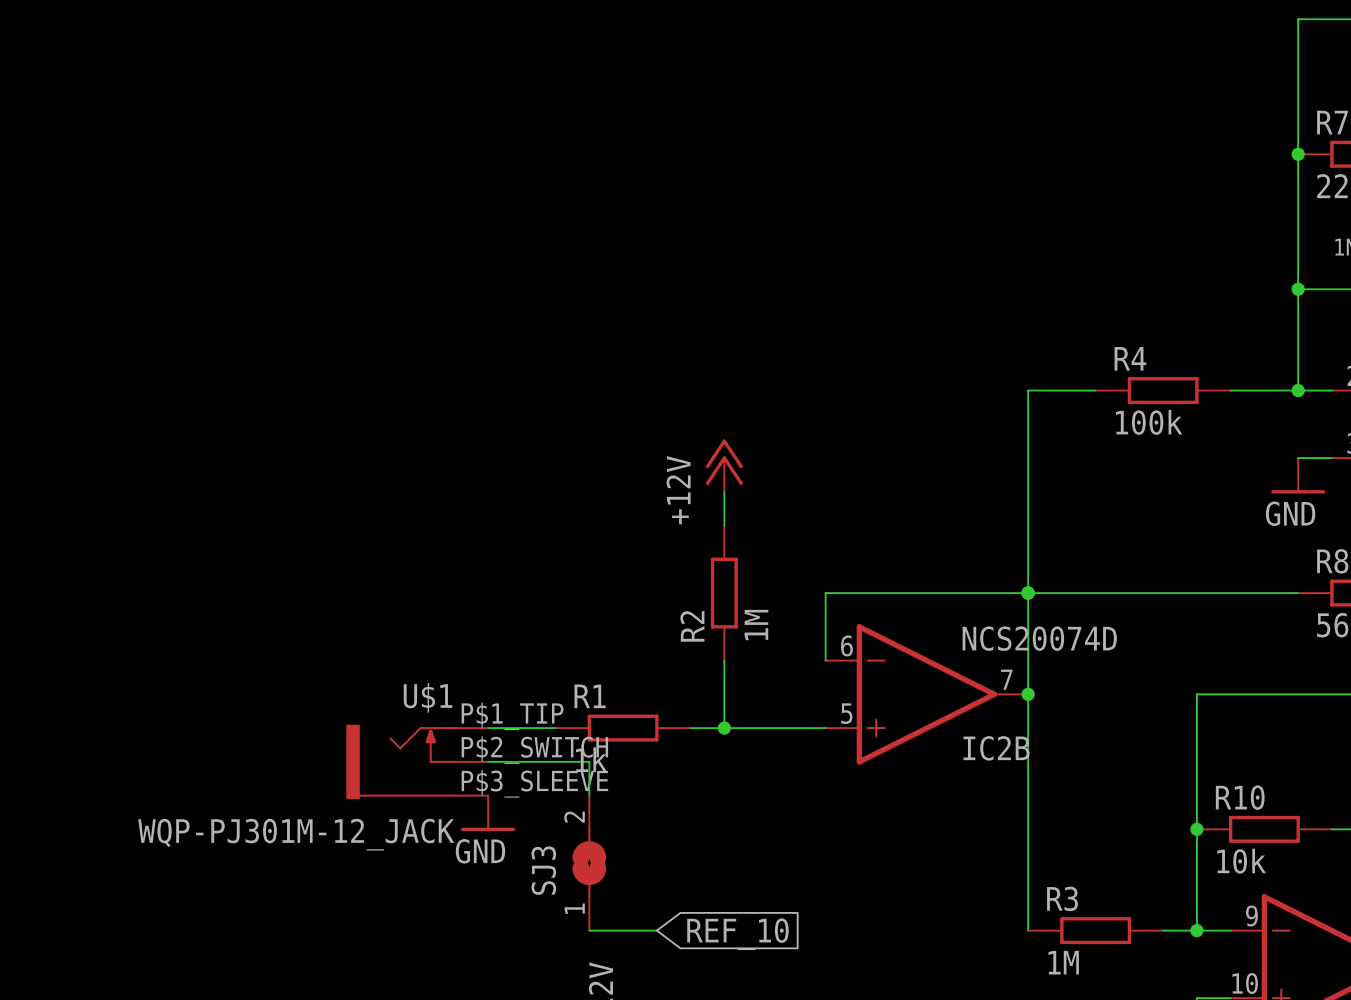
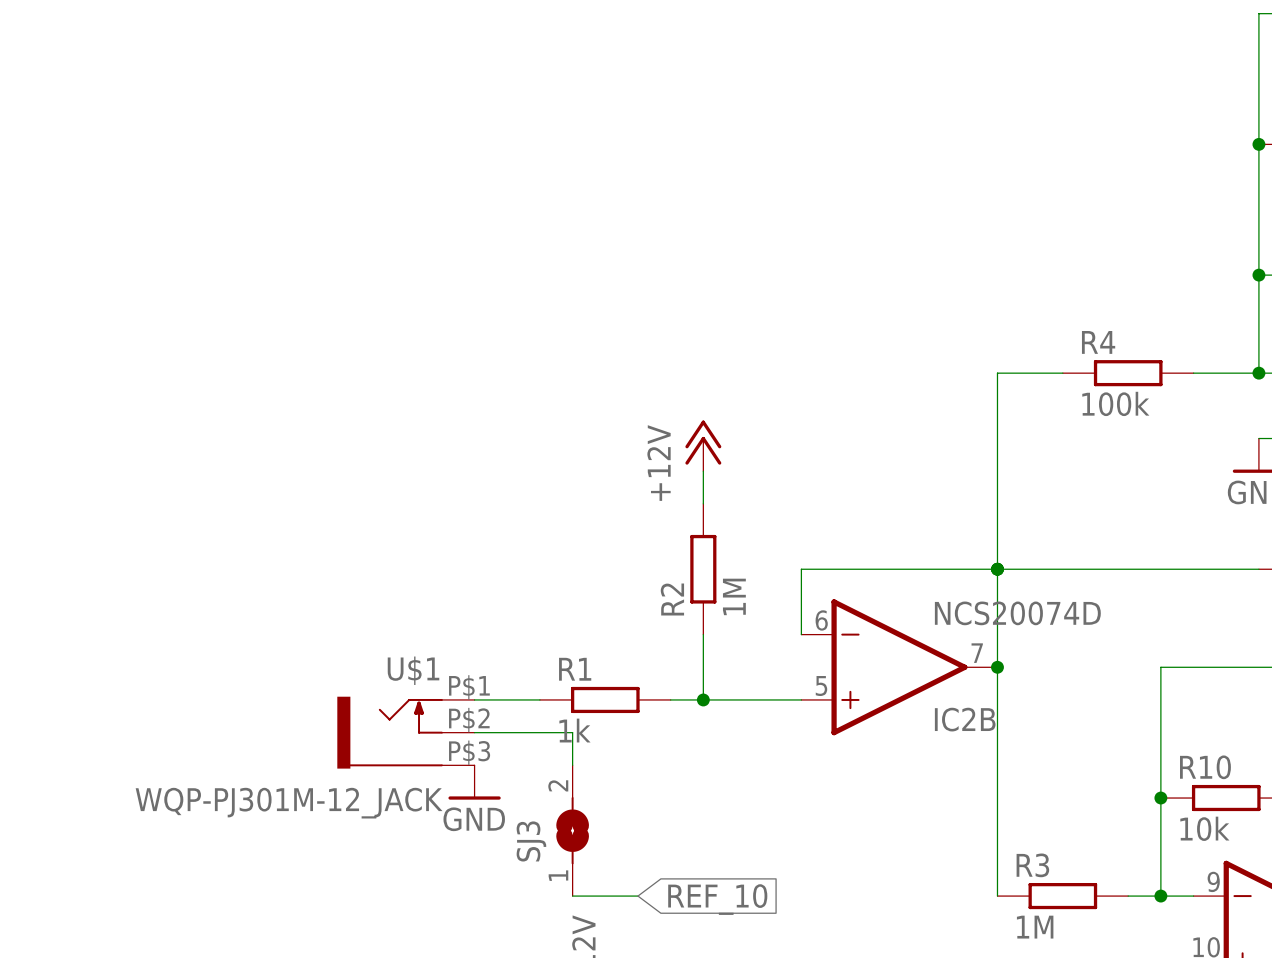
U$1 pin number: P$1_TIP (512, 716) -> P$1 (469, 687)
U$1 pin number: P$2_SWITCH (534, 750) -> P$2 (469, 720)
U$1 pin number: P$3_SLEEVE (534, 783) -> P$3 (469, 752)

